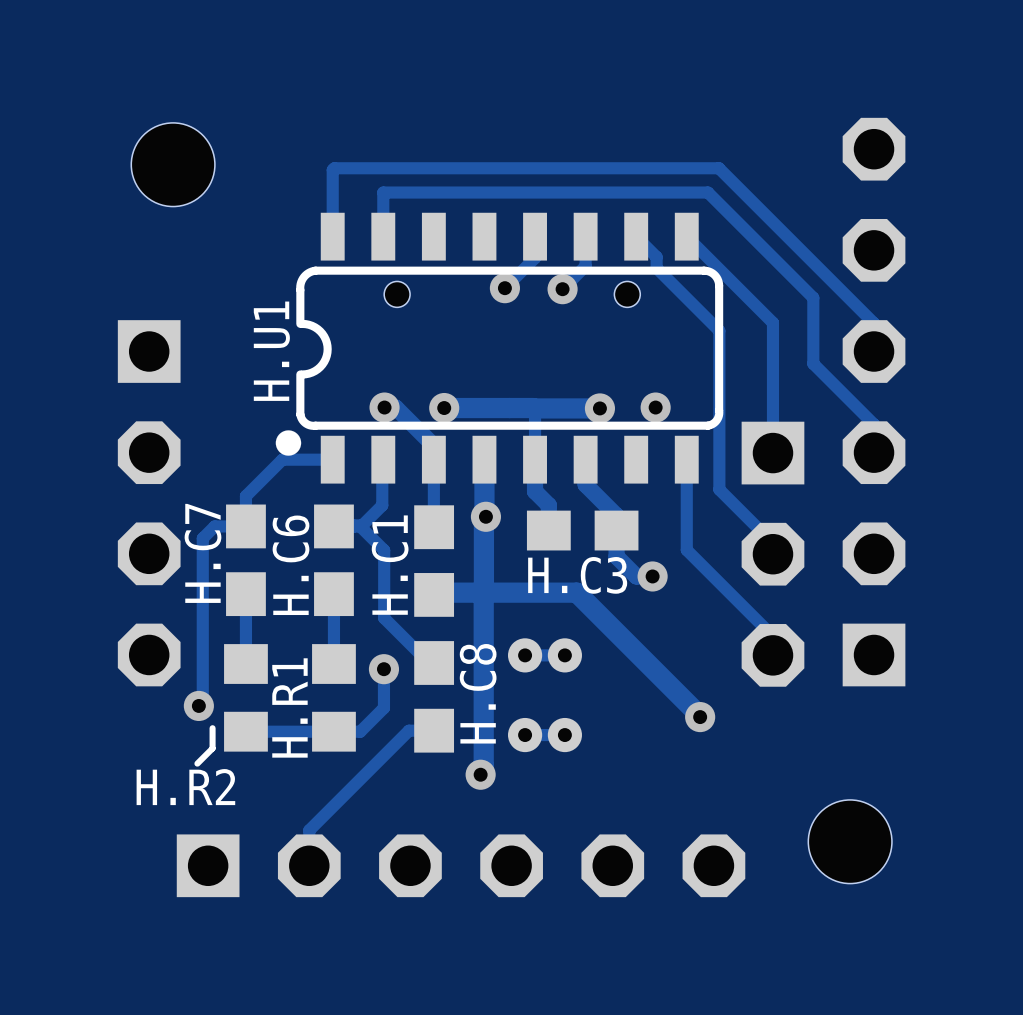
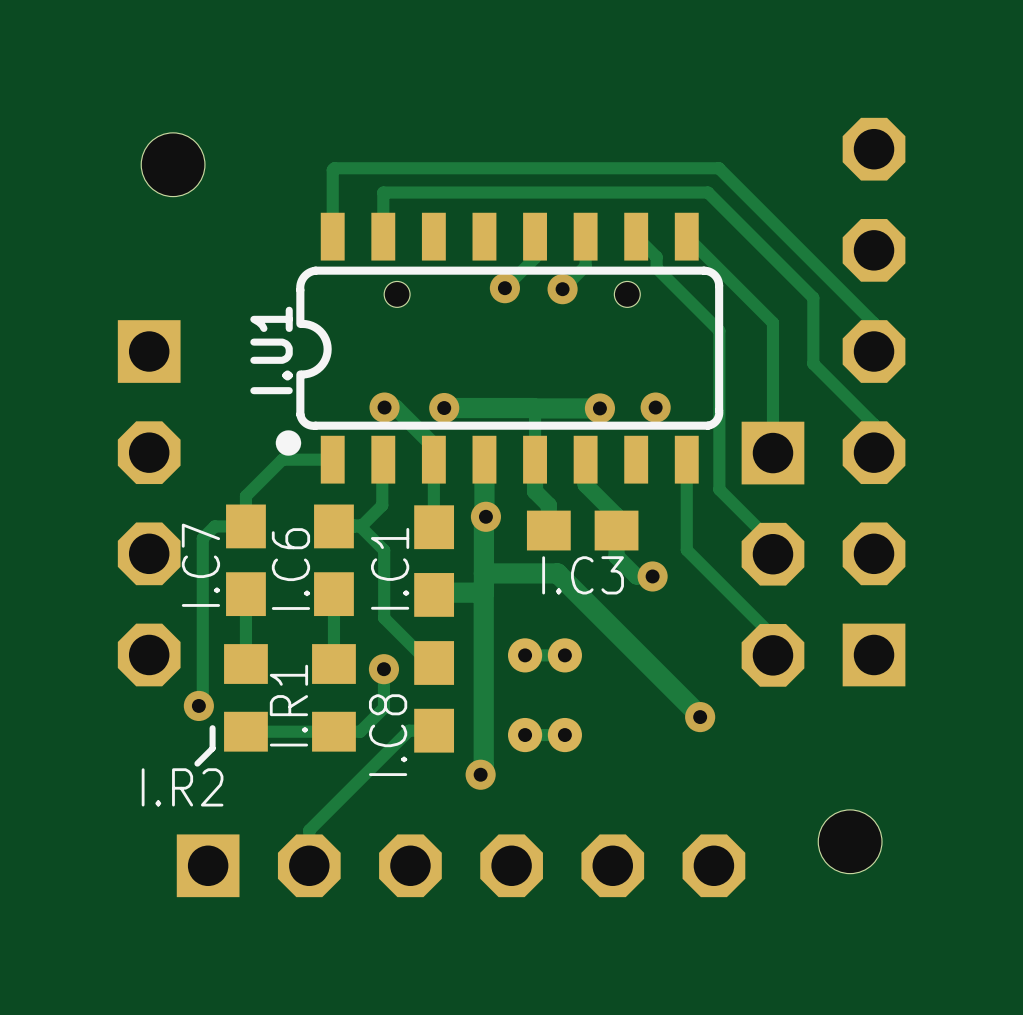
hole size: [131, 122, 215, 207] -> [141, 132, 205, 197]
H.U1 name: H.U1 (271, 351) -> I.U1 (271, 350)
H.C7 name: H.C7 (202, 553) -> I.C7 (200, 565)
H.C6 name: H.C6 (291, 565) -> I.C6 (290, 569)
H.C1 name: H.C1 (390, 565) -> I.C1 (390, 568)
H.C3 name: H.C3 (577, 575) -> I.C3 (583, 575)
track: (576, 592) (483, 592) -> (576, 592) (557, 573) (483, 573)
H.C8 name: H.C8 (478, 693) -> I.C8 (388, 735)
H.R1 name: H.R1 (289, 707) -> I.R1 (288, 705)
H.R2 name: H.R2 (185, 787) -> I.R2 (182, 787)
hole size: [808, 799, 892, 884] -> [818, 809, 882, 874]

